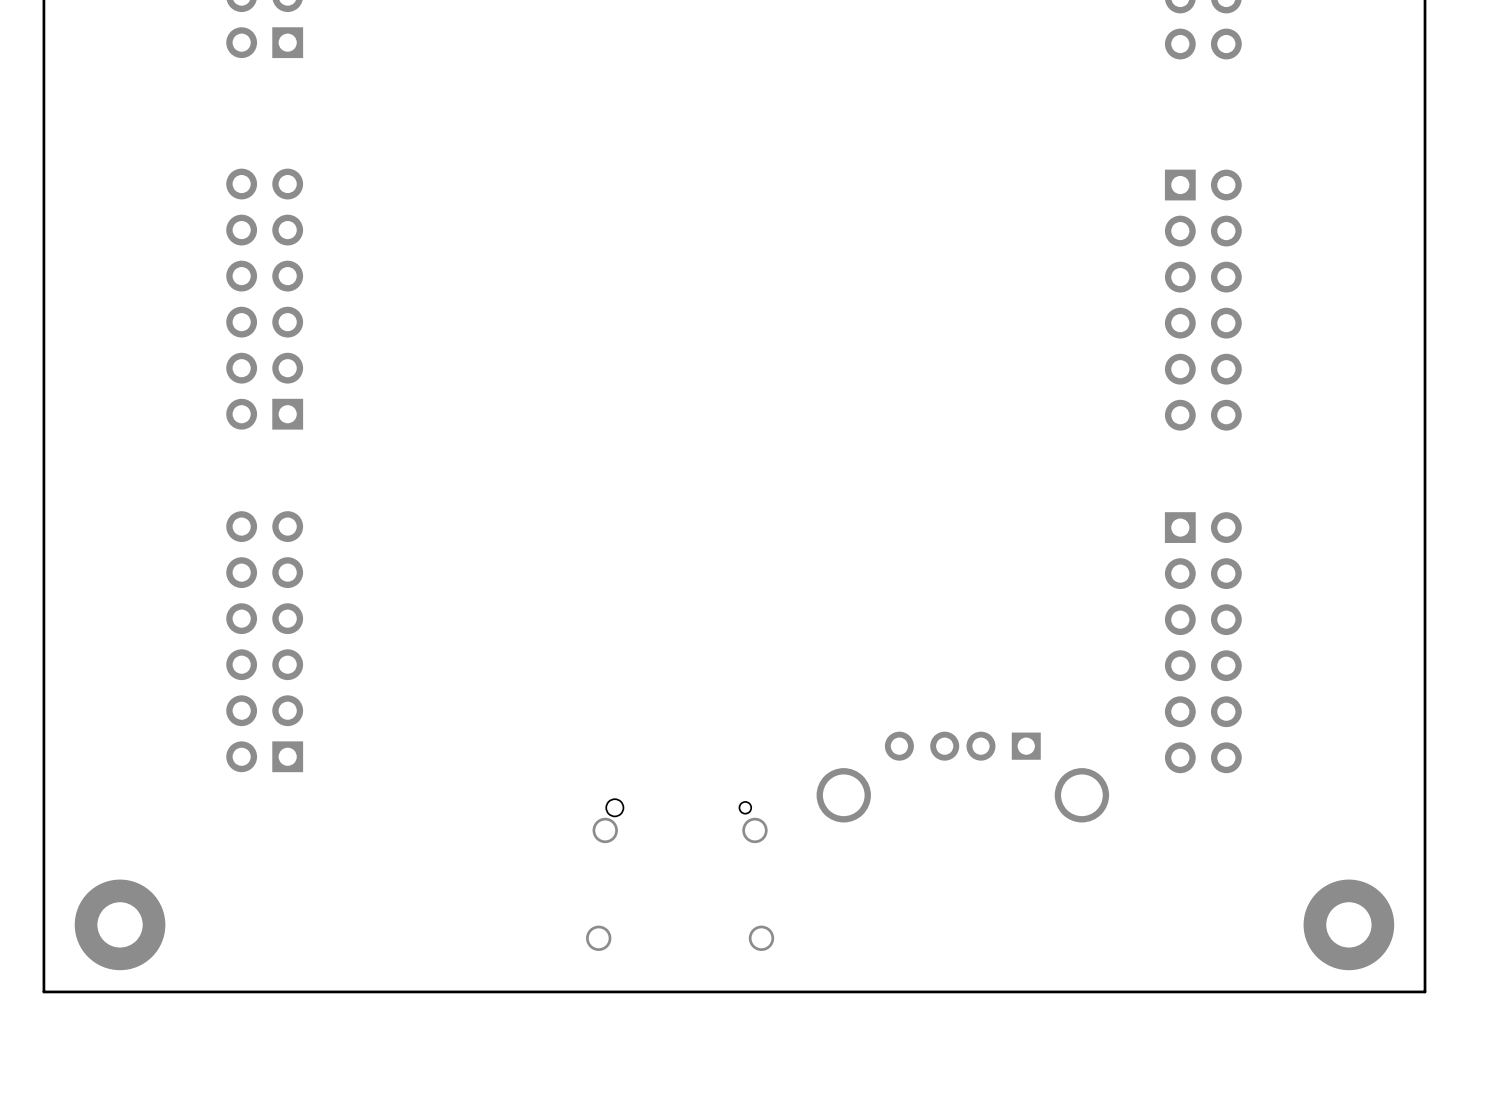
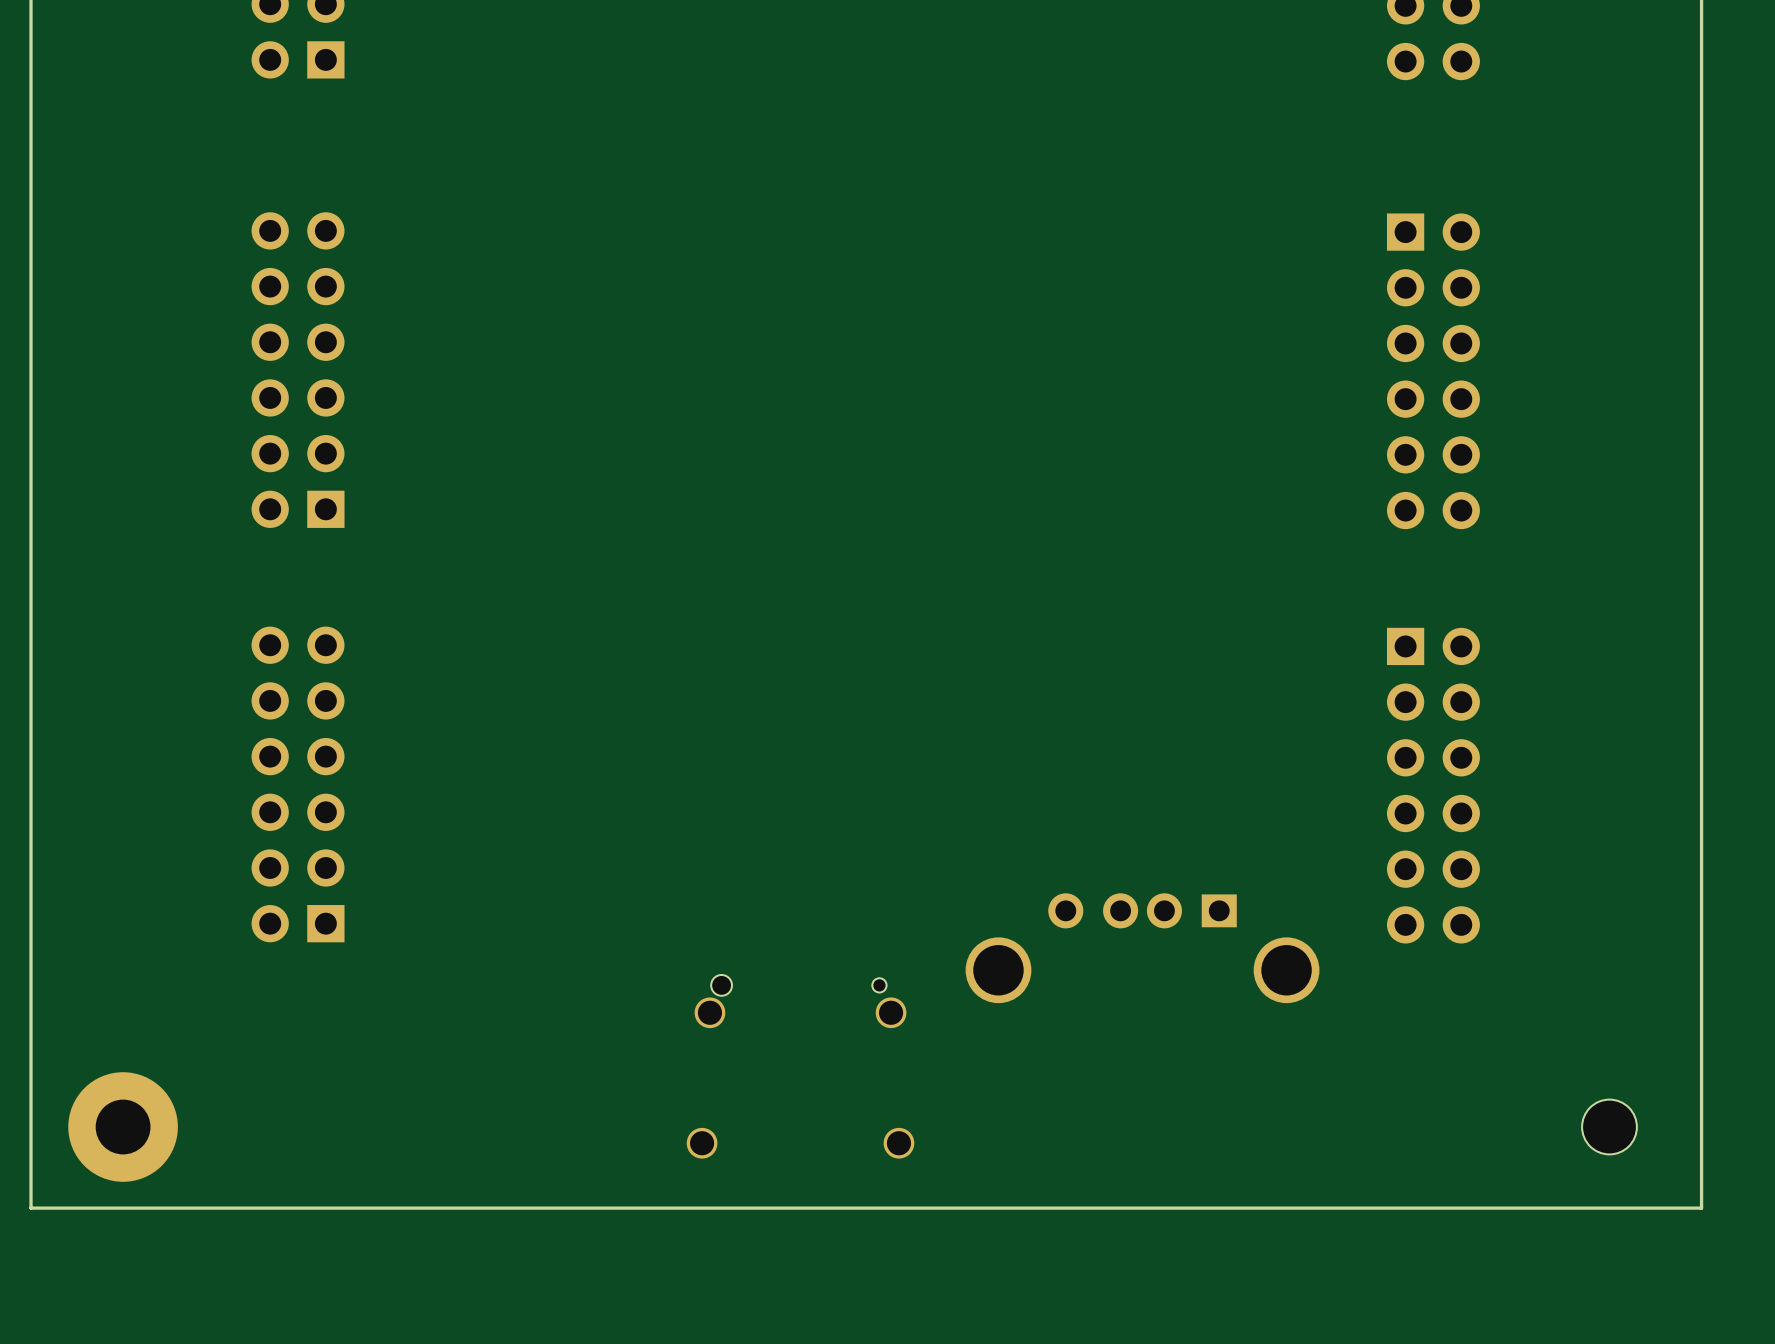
part footprint: [1303, 879, 1395, 971] -> [1582, 1099, 1637, 1155]

